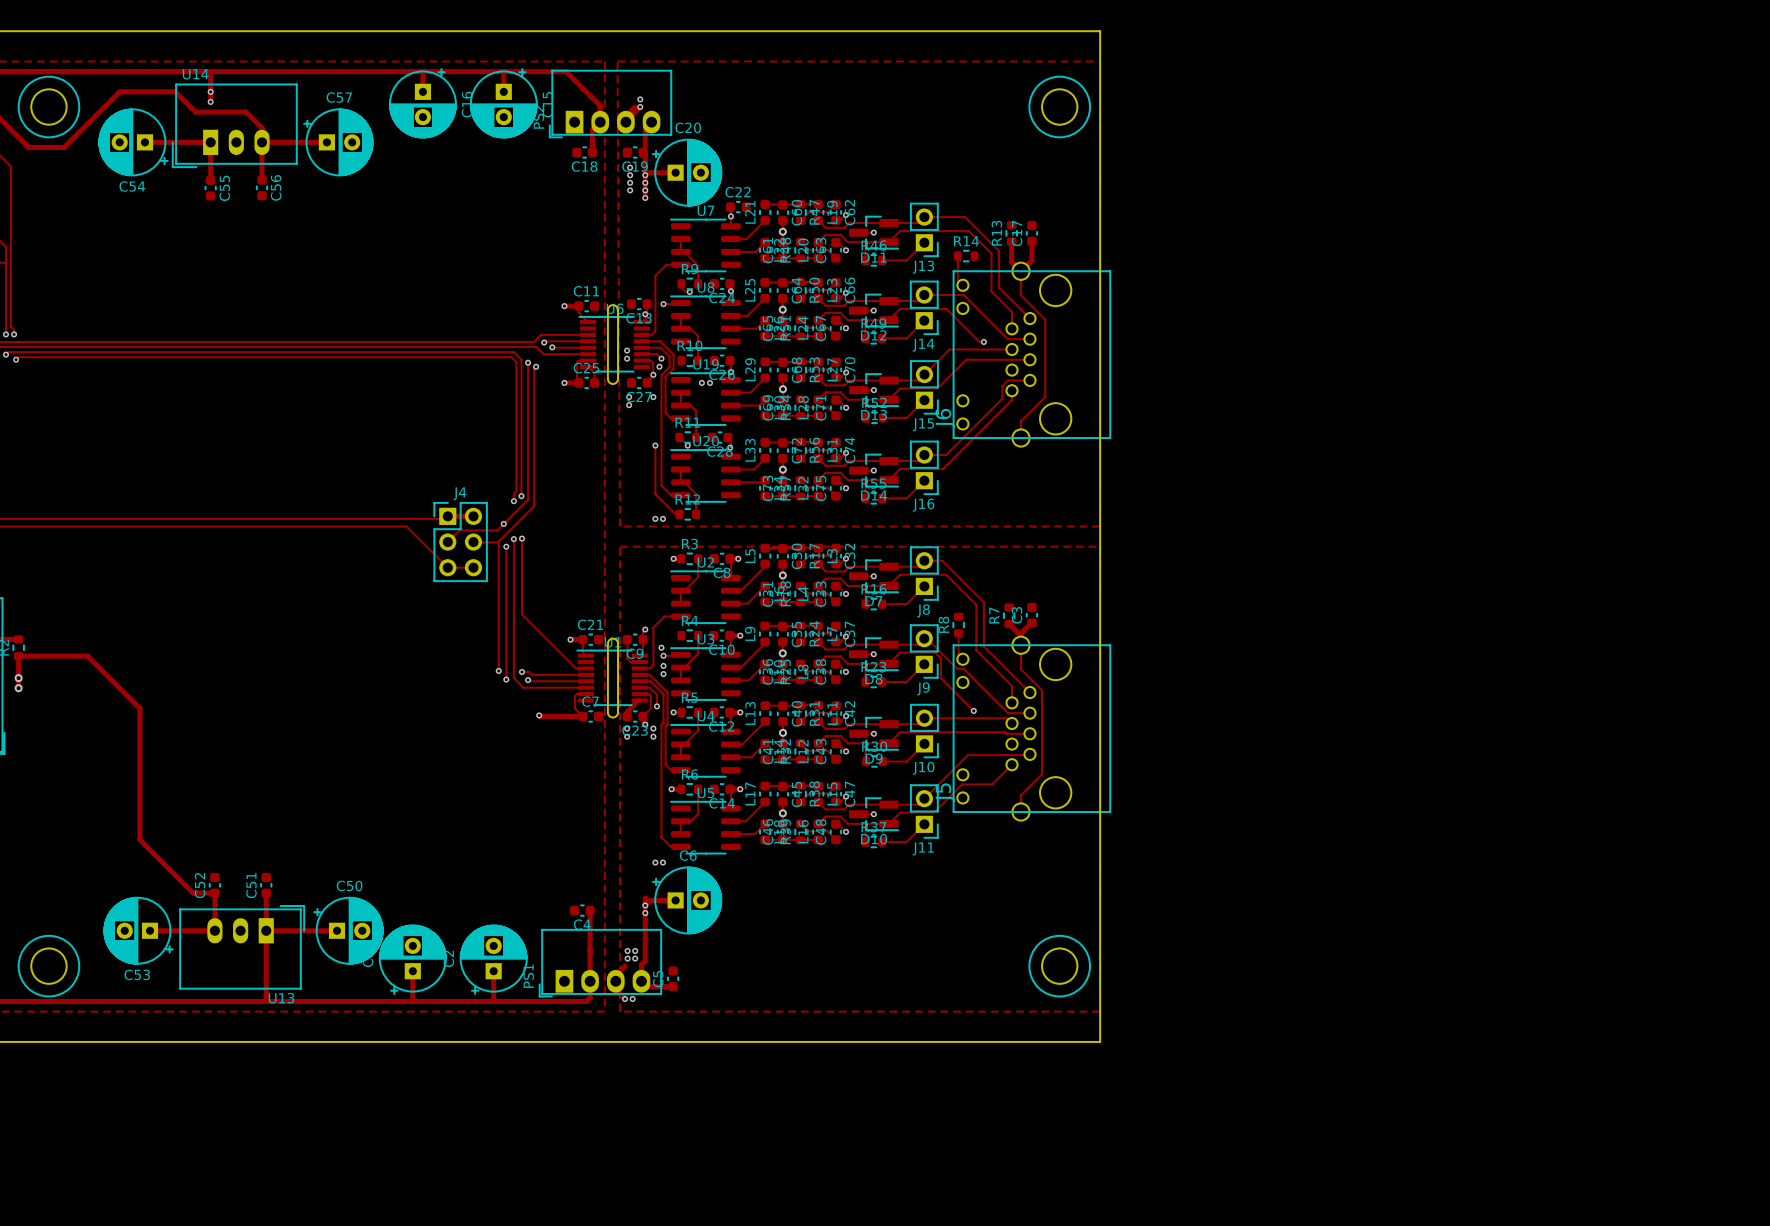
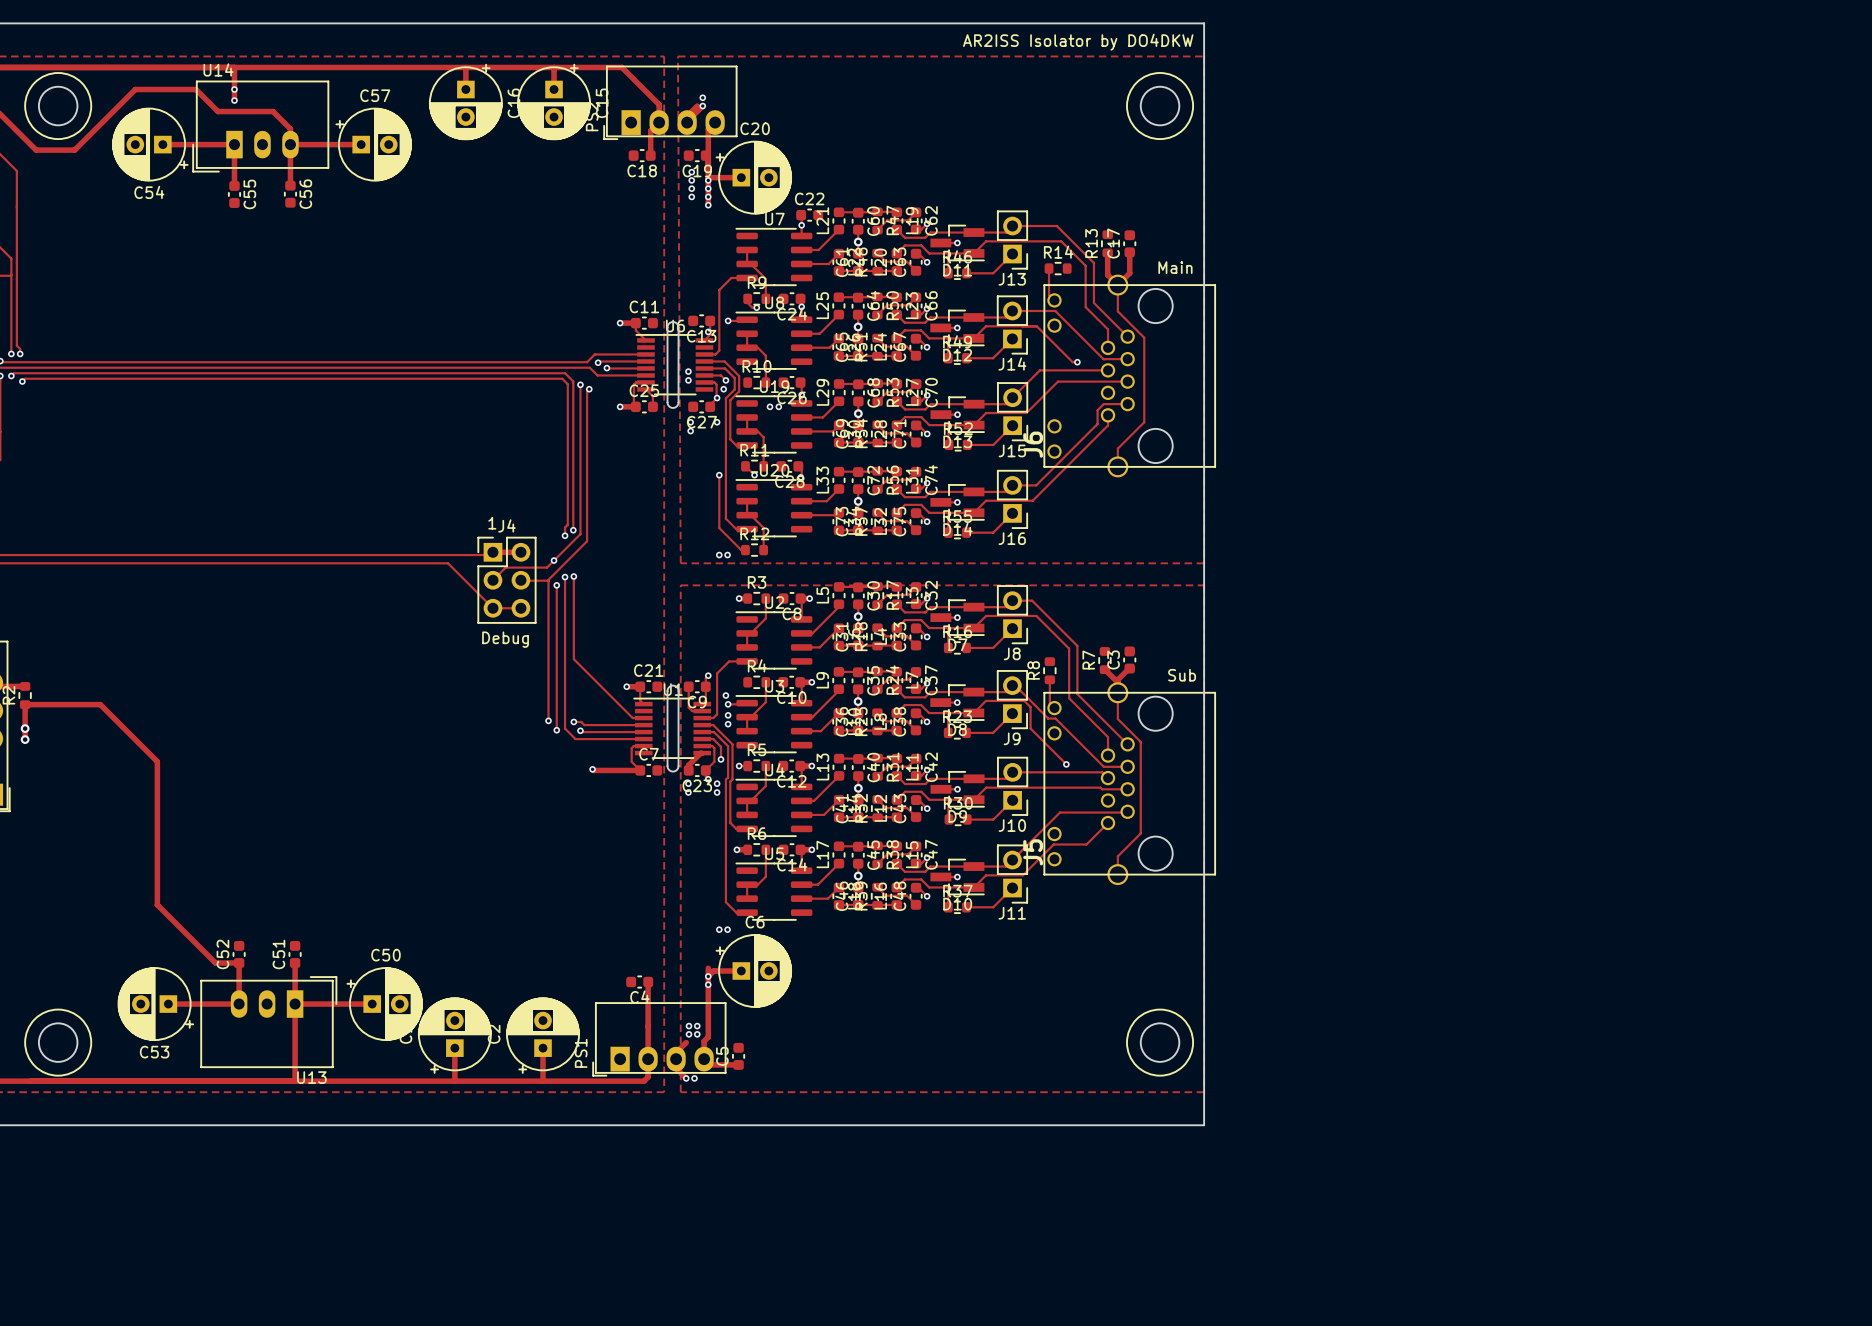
text: none -> AR2ISS Isolator by DO4DKW (1078, 42)
text: none -> Main (1175, 267)
text: none -> 1 (492, 523)
text: none -> Debug (505, 639)
text: none -> Sub (1182, 675)

